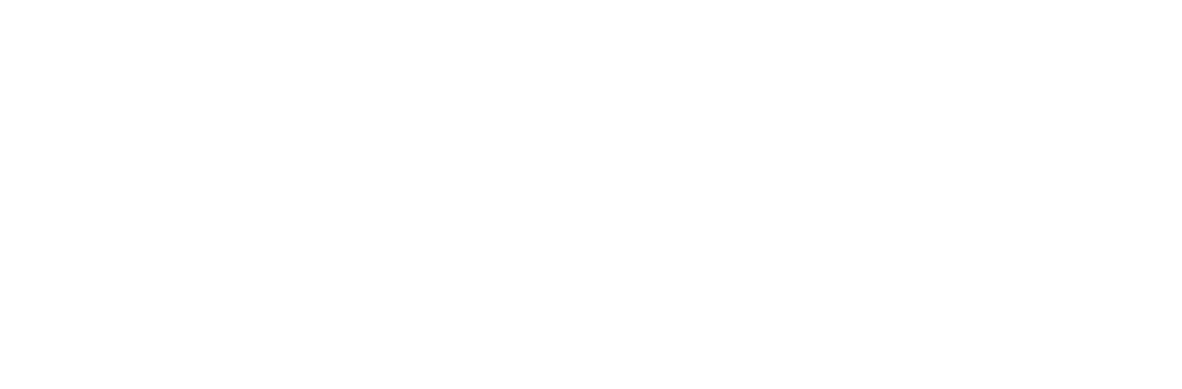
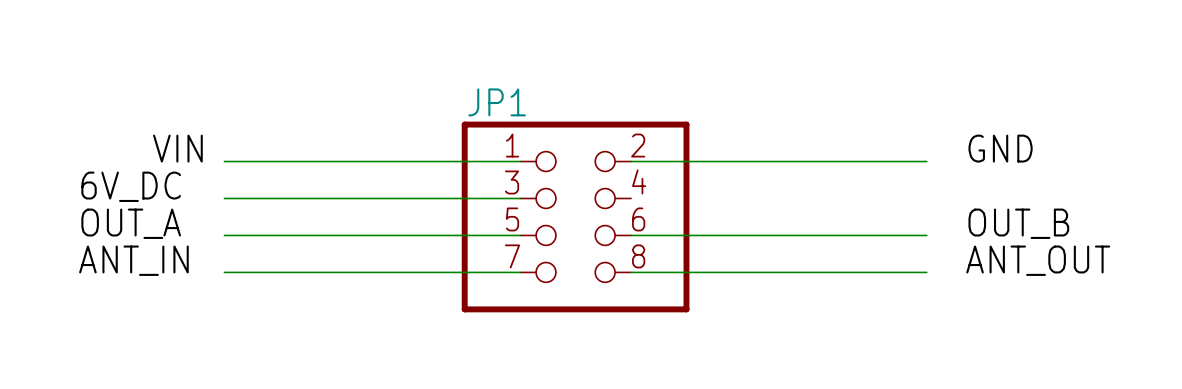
label: none -> VIN (177, 148)
label: none -> GND (1000, 148)
wire: none -> (224, 161) (520, 161)
wire: none -> (631, 161) (926, 161)
label: none -> 6V_DC (131, 186)
wire: none -> (224, 198) (520, 198)
JP1: none -> (575, 216)
label: none -> OUT_A (131, 223)
label: none -> OUT_B (1018, 223)
wire: none -> (224, 235) (520, 235)
wire: none -> (631, 235) (926, 235)
label: none -> ANT_IN (133, 260)
label: none -> ANT_OUT (1038, 260)
wire: none -> (224, 272) (520, 272)
wire: none -> (631, 272) (926, 272)

